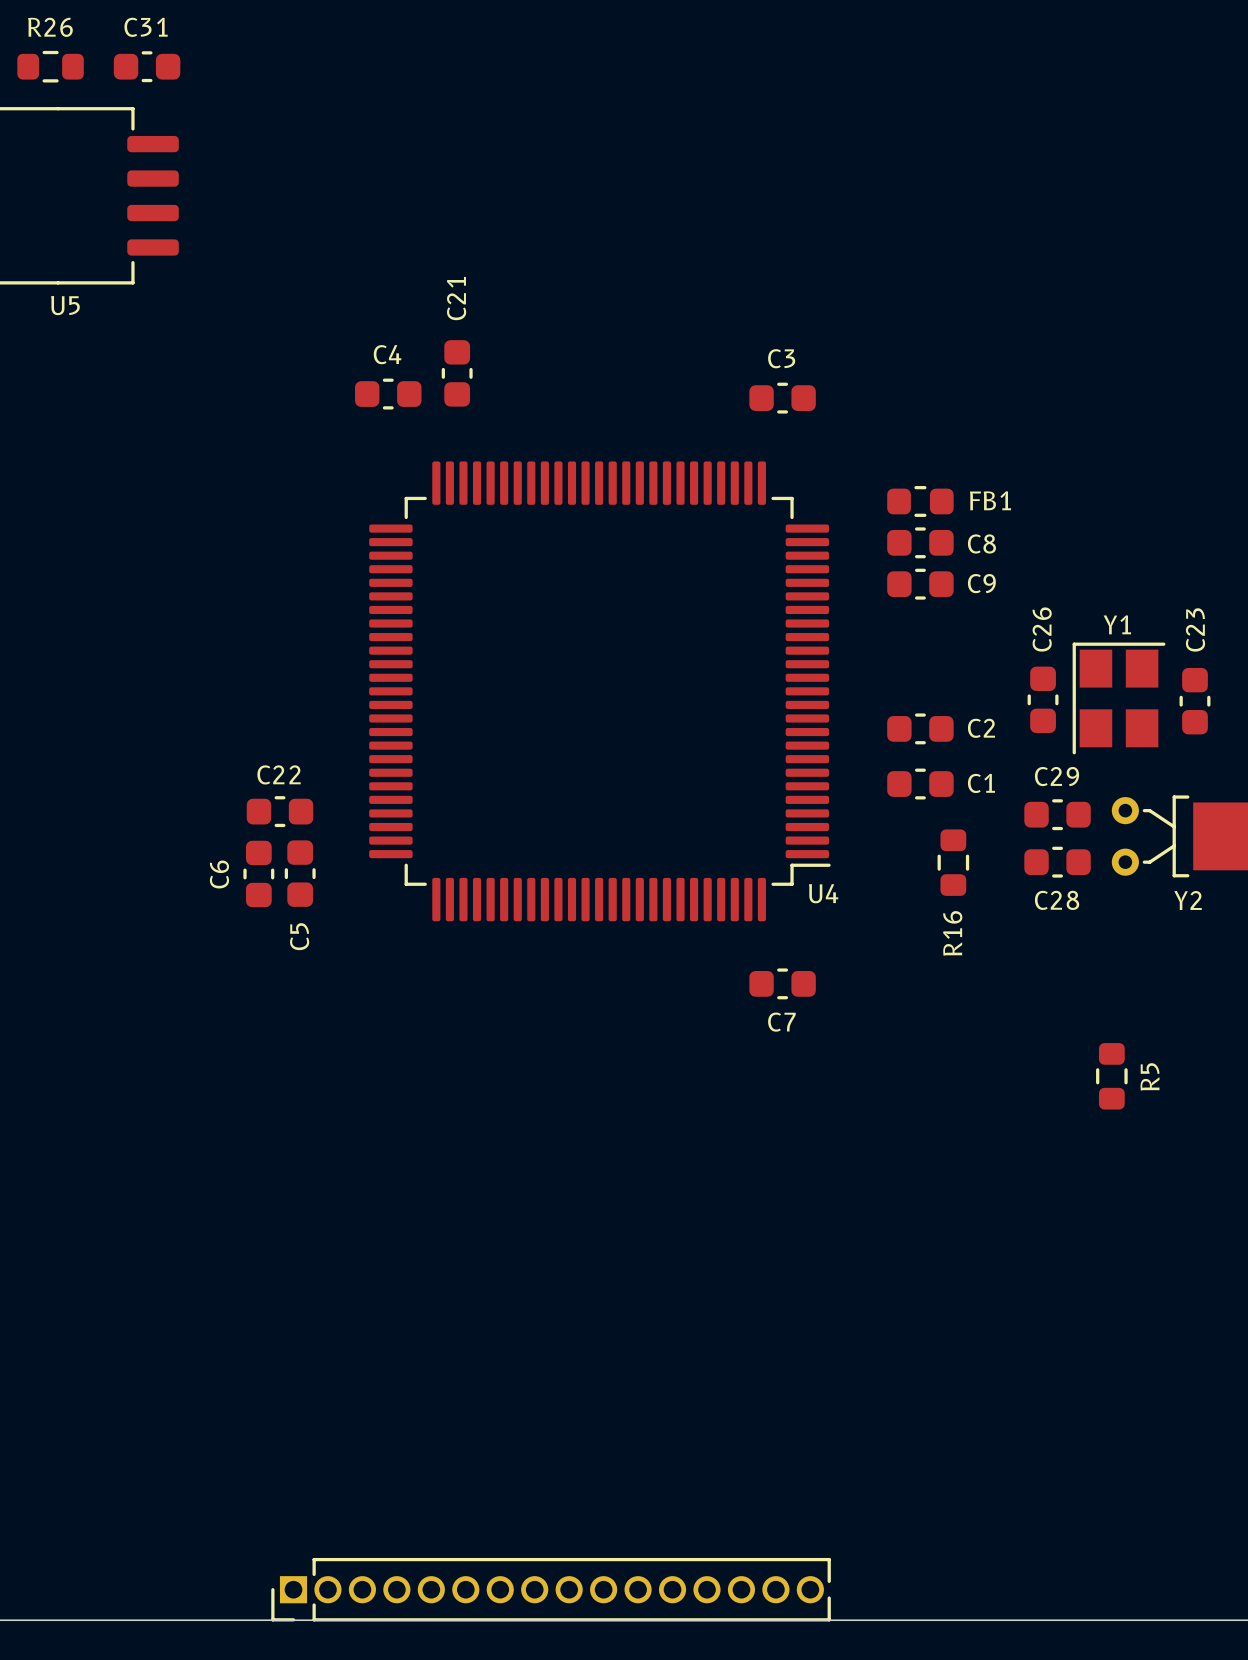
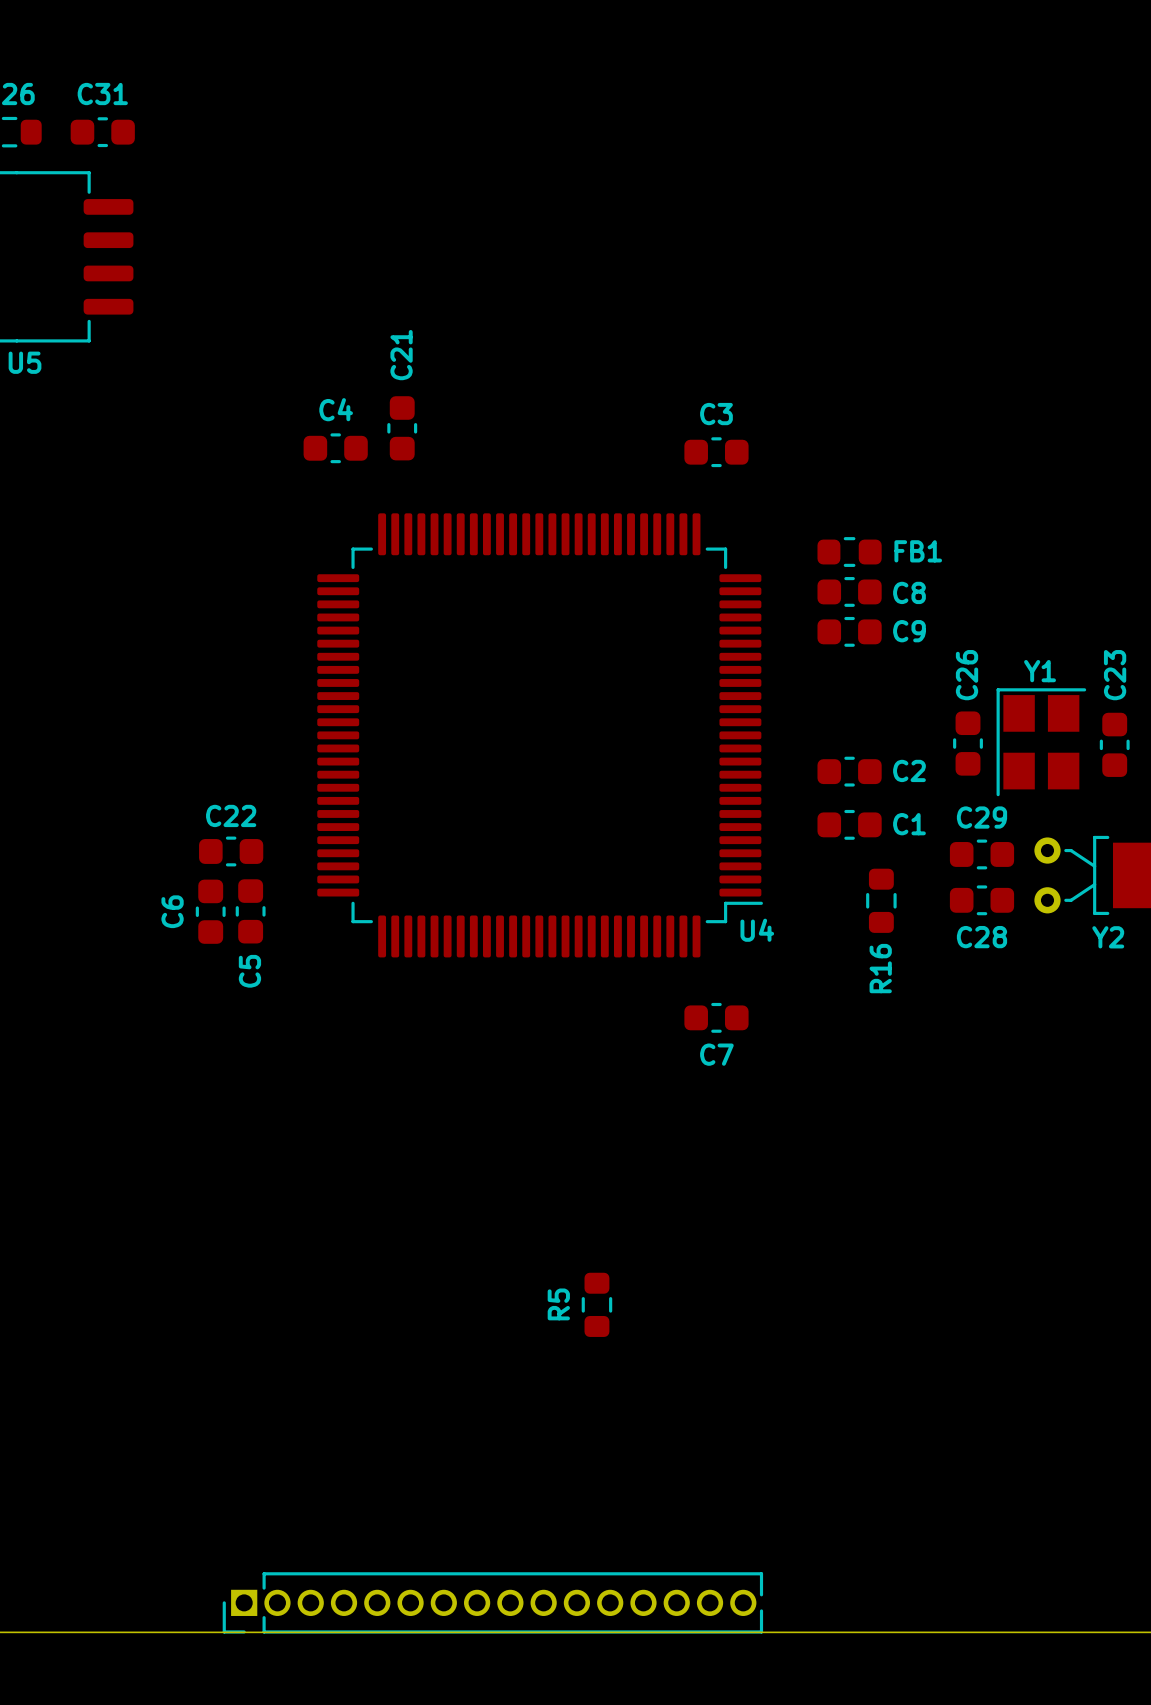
R5 position: (1111, 1076) -> (596, 1304)
R5 name position: R5 (1150, 1076) -> R5 (558, 1304)

